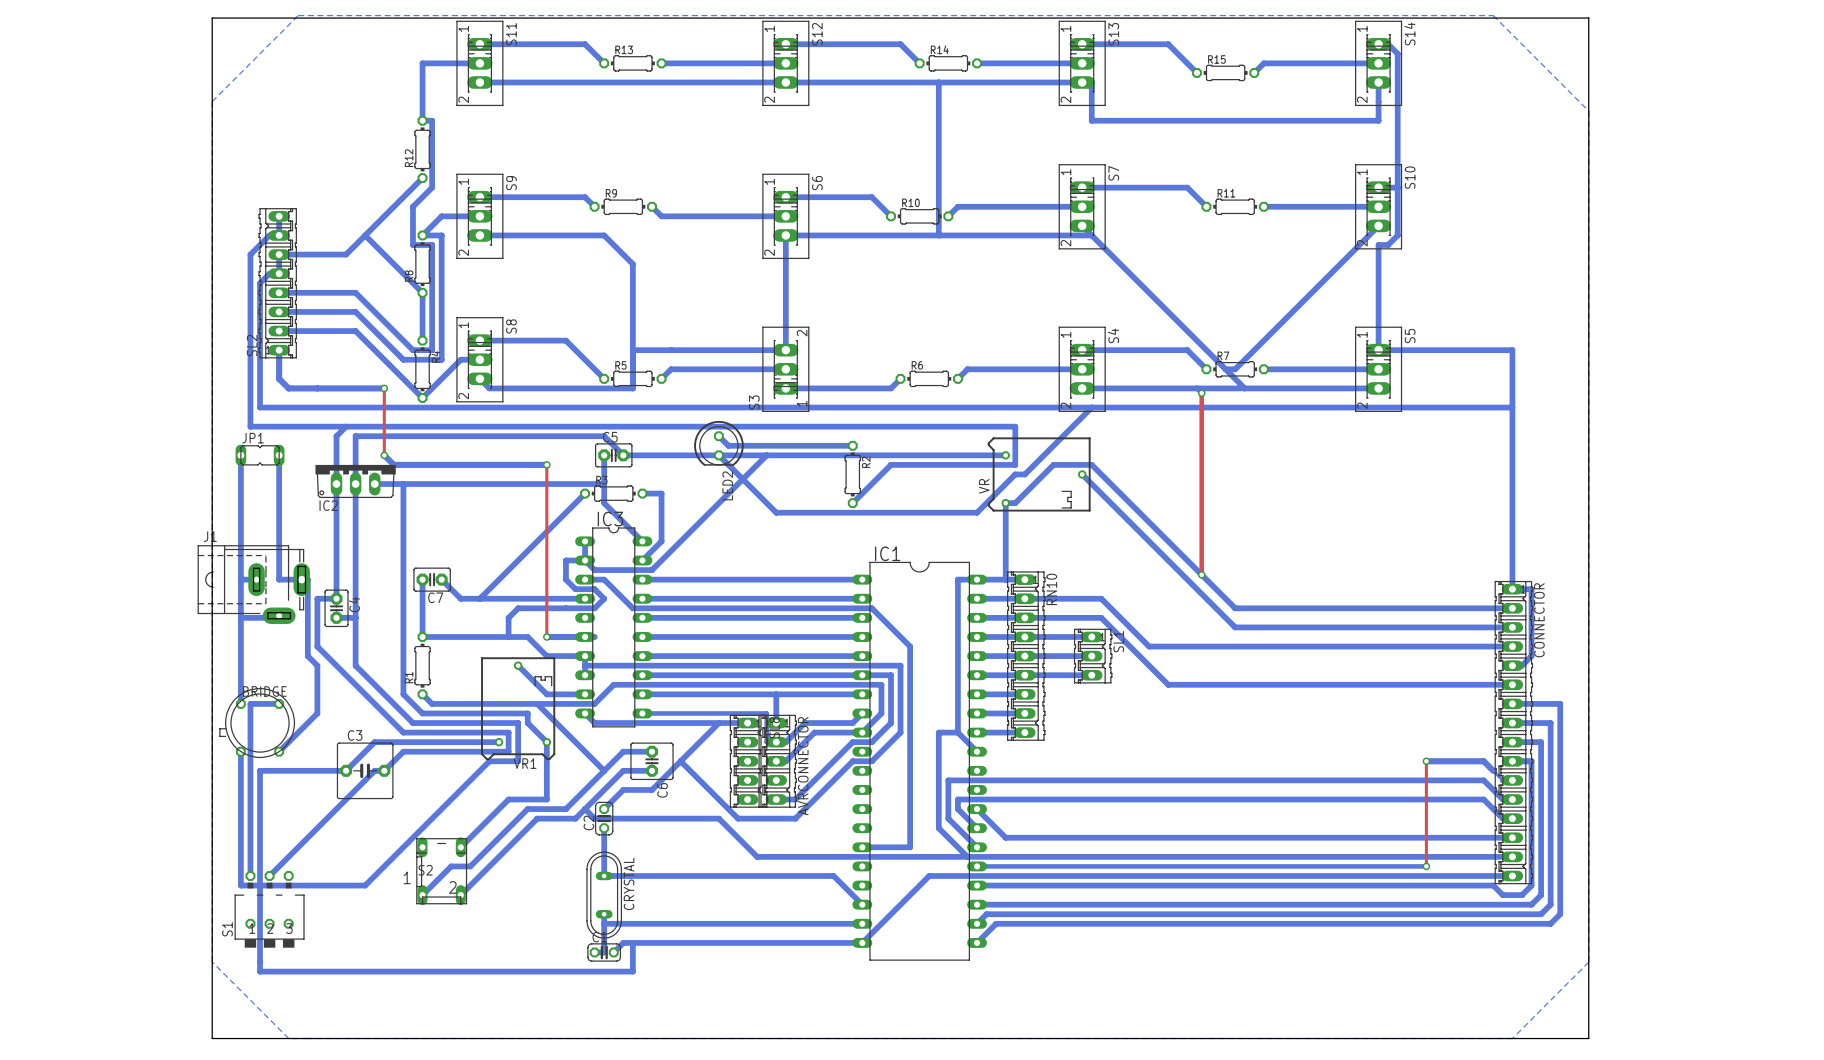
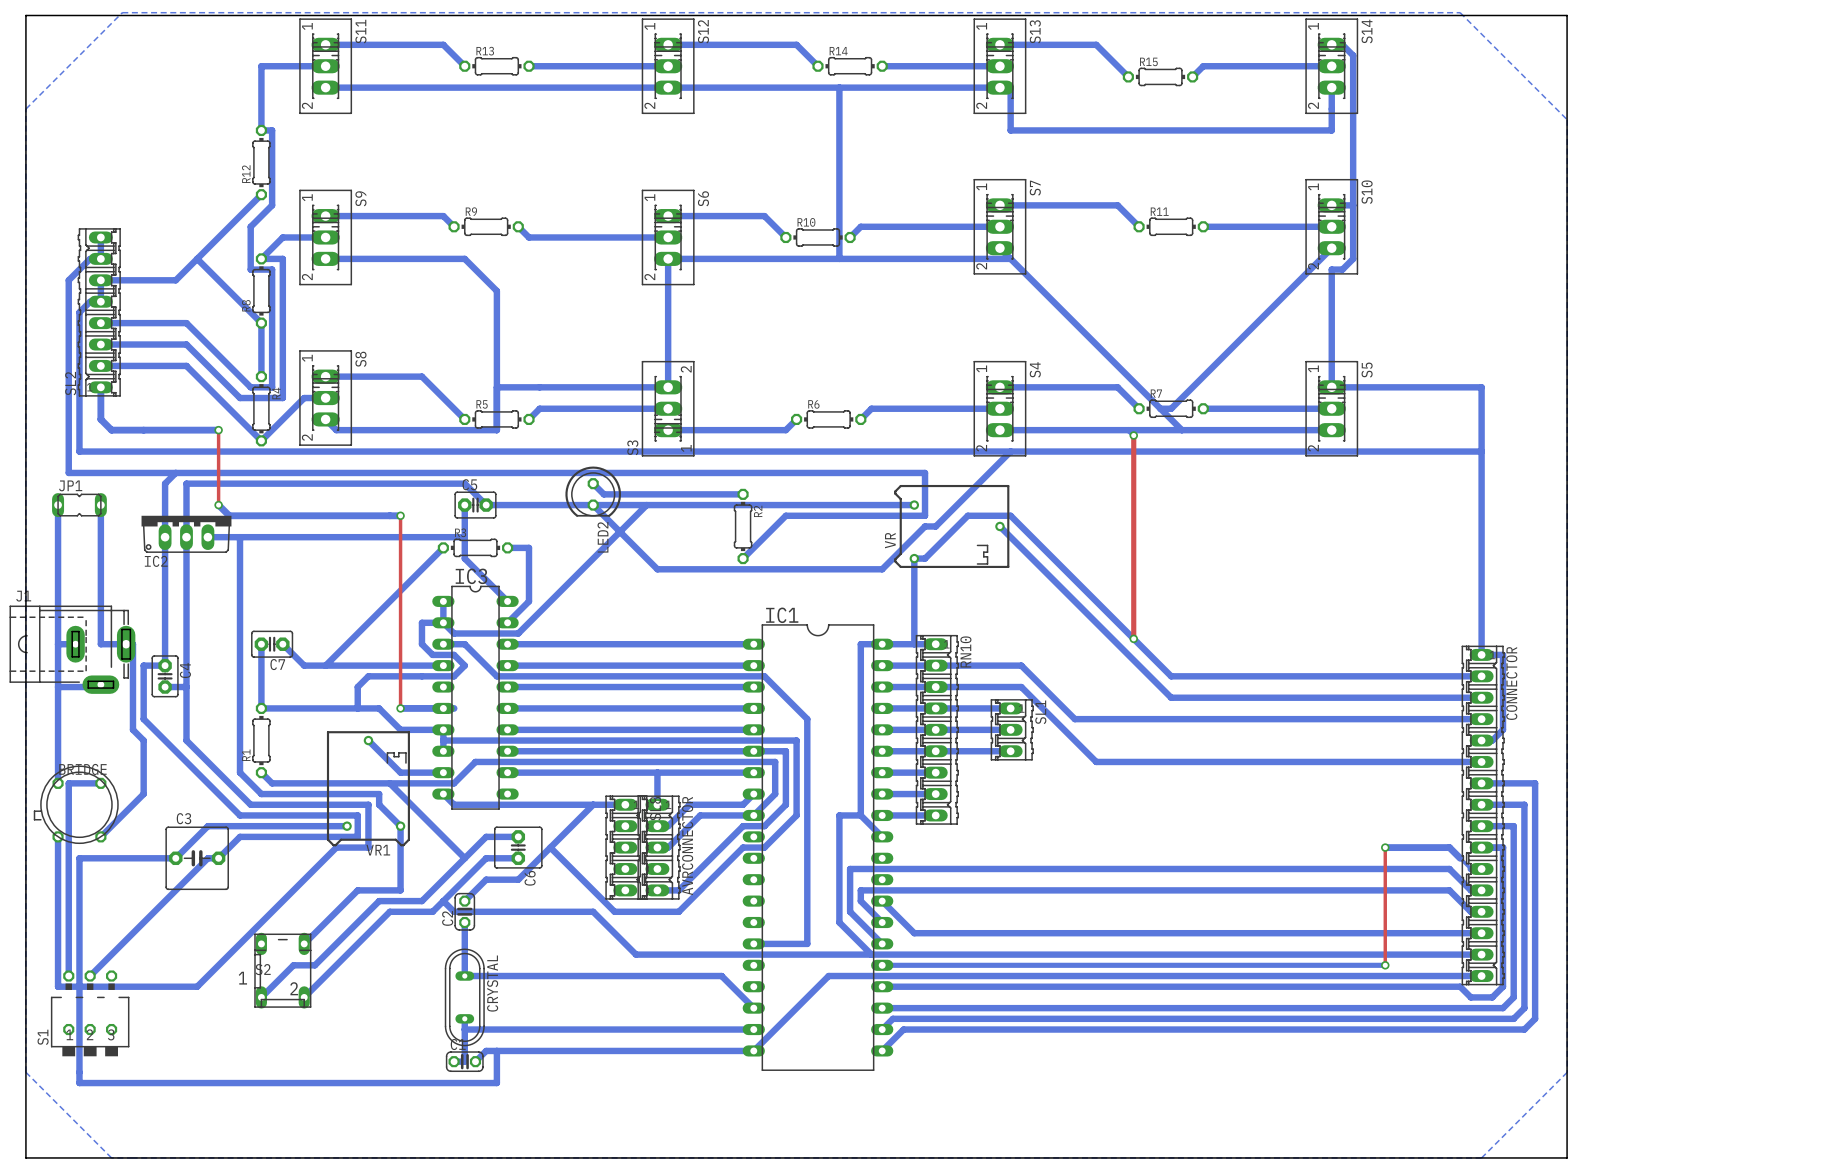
bottom track: (642, 713) (766, 713) (766, 742) (785, 742) -> none

